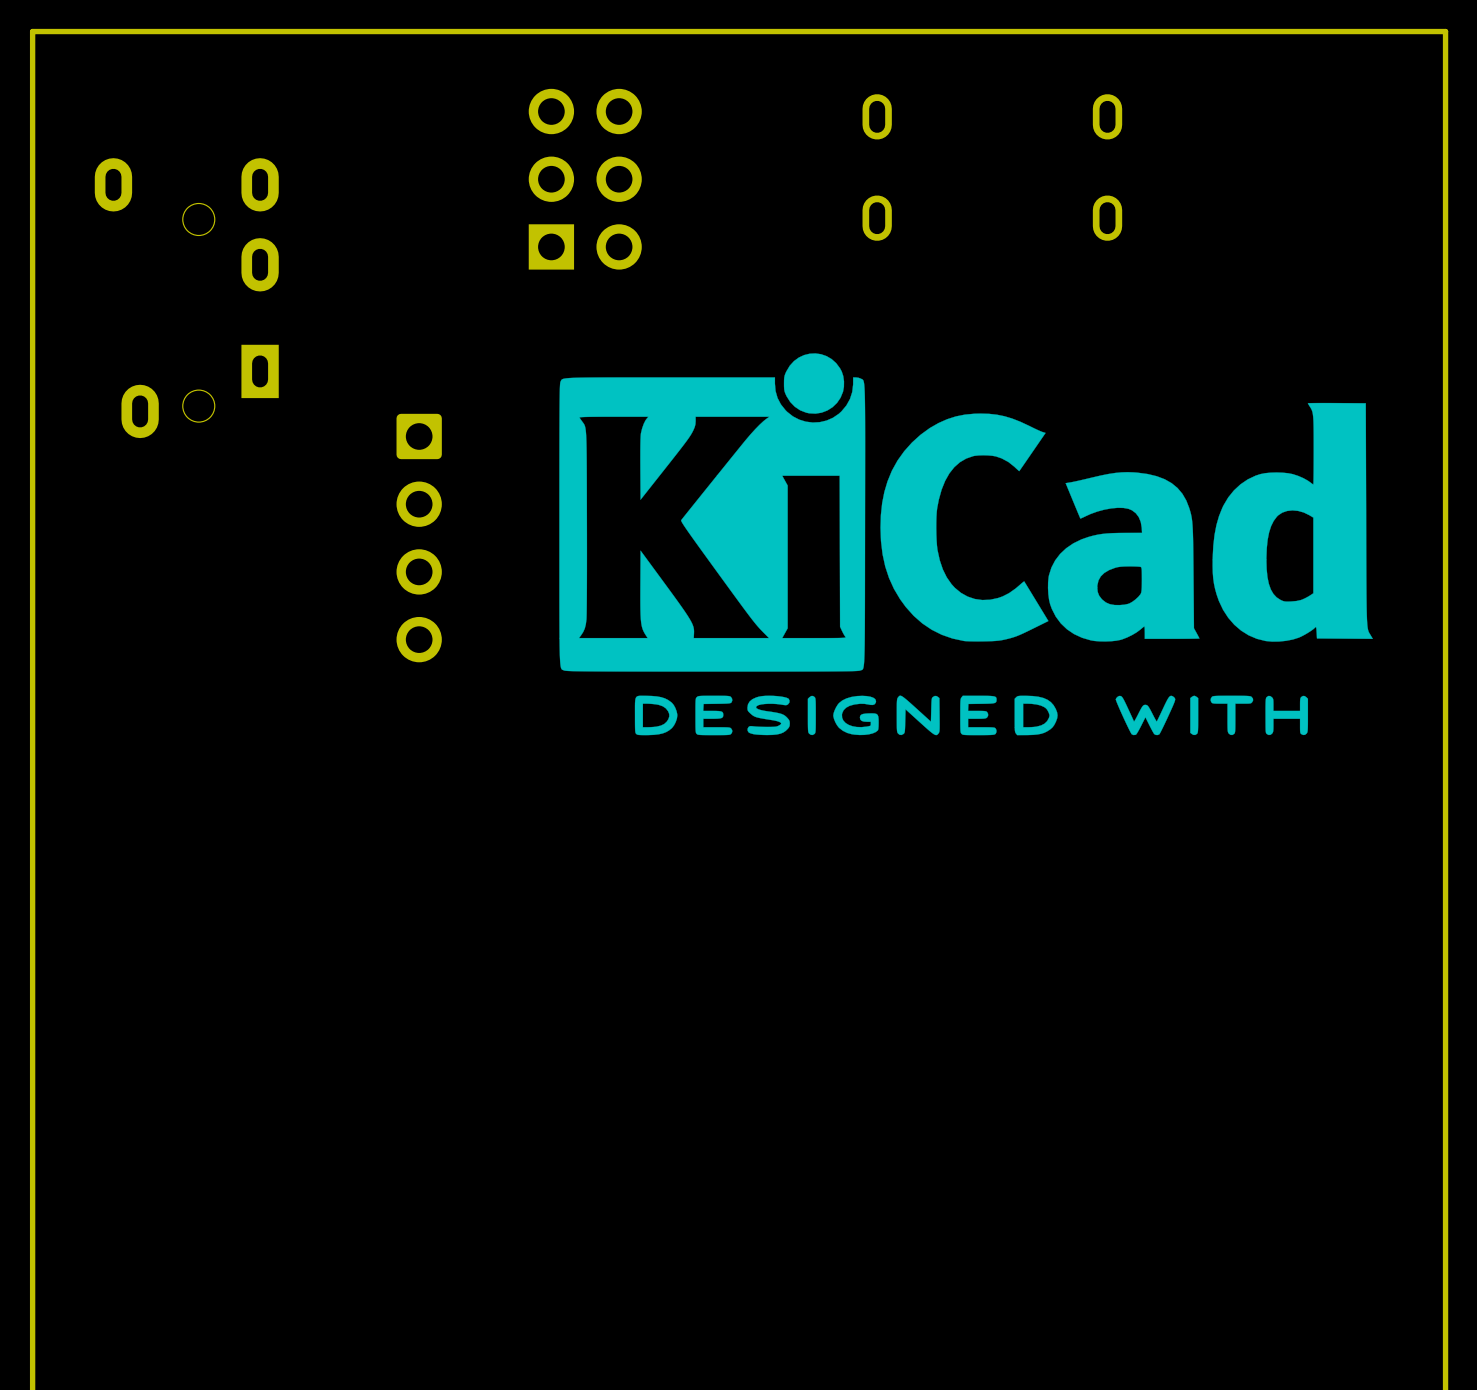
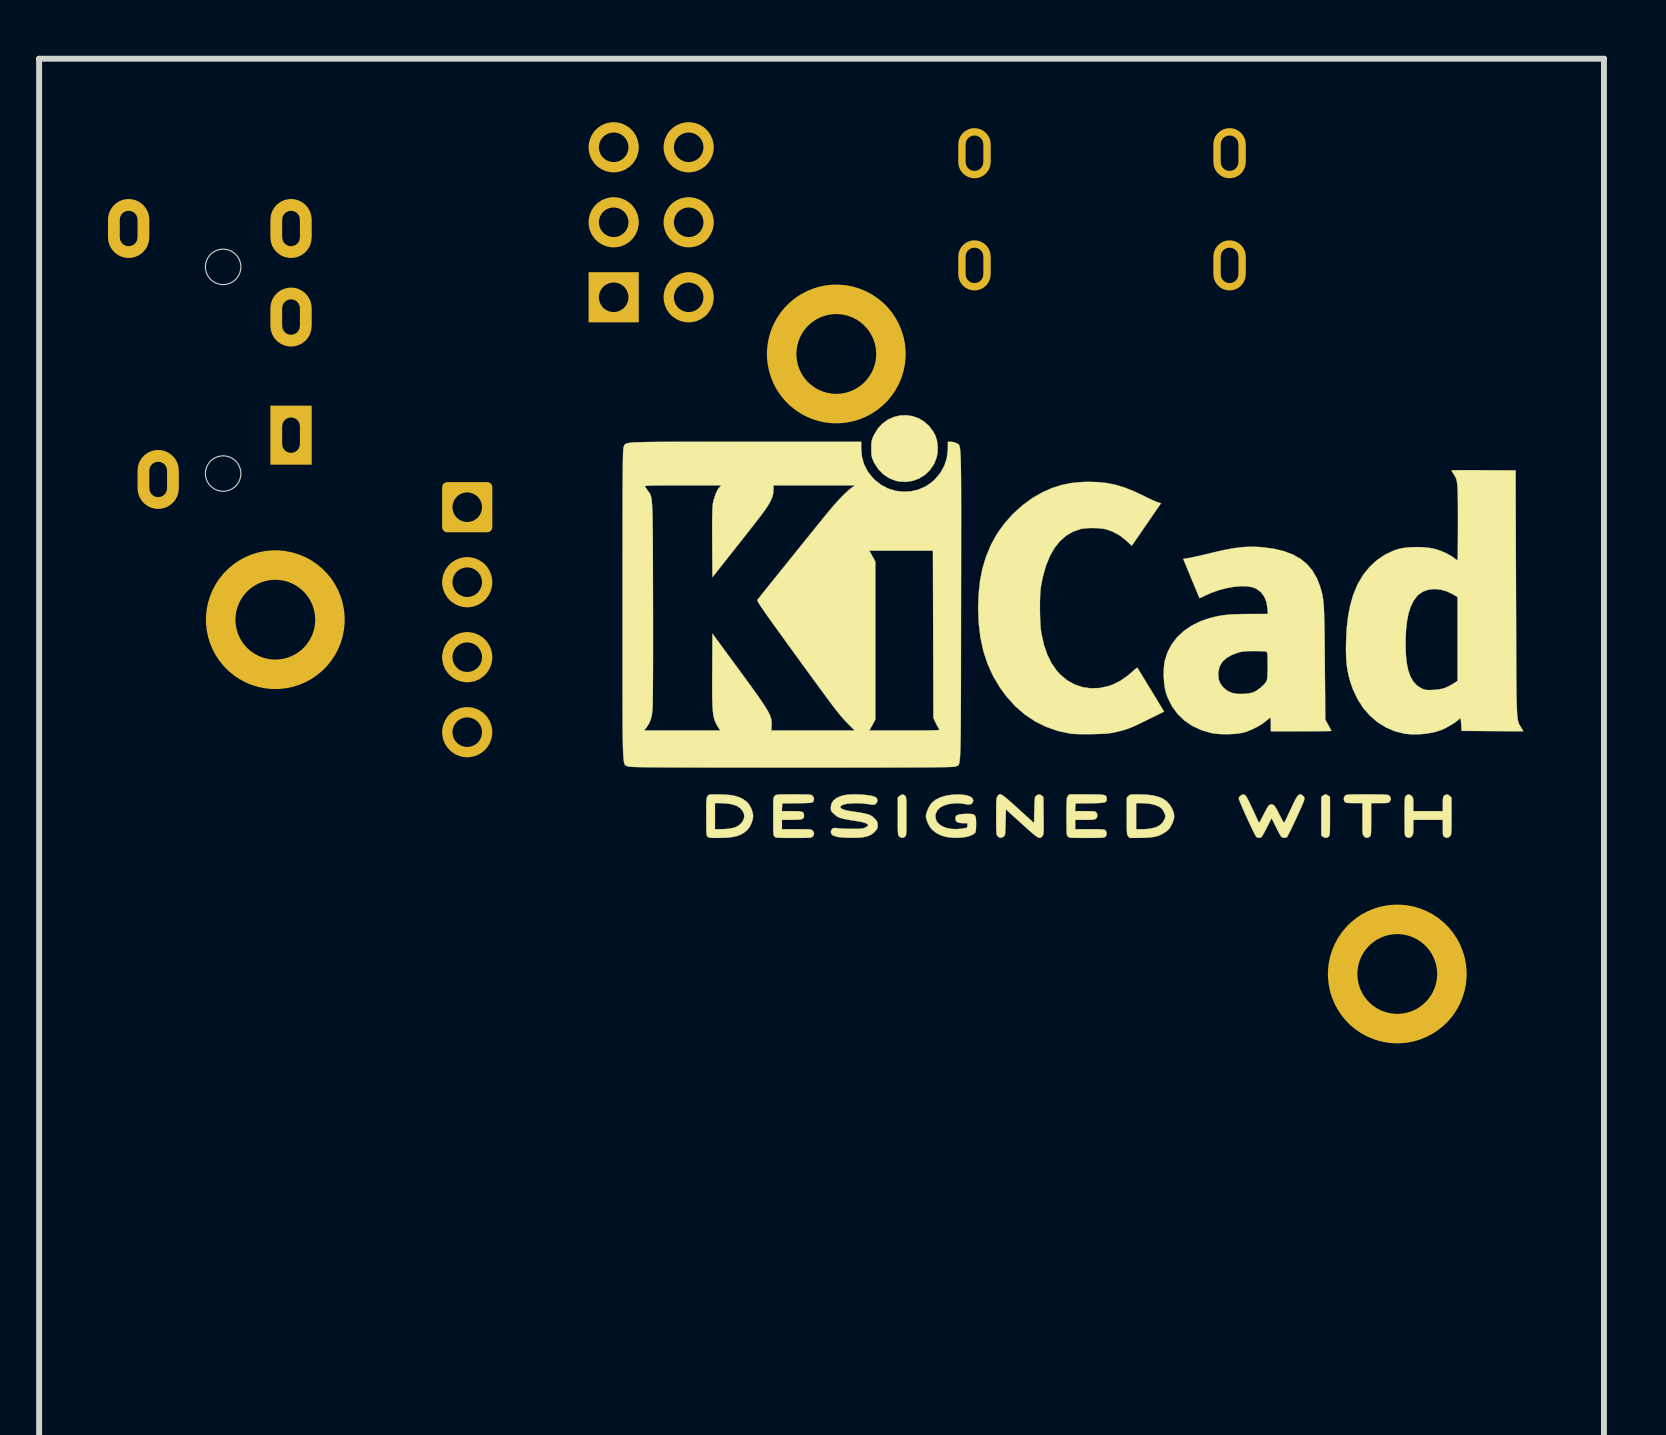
part: none -> (836, 353)
part: none -> (275, 619)
part: none -> (1397, 973)

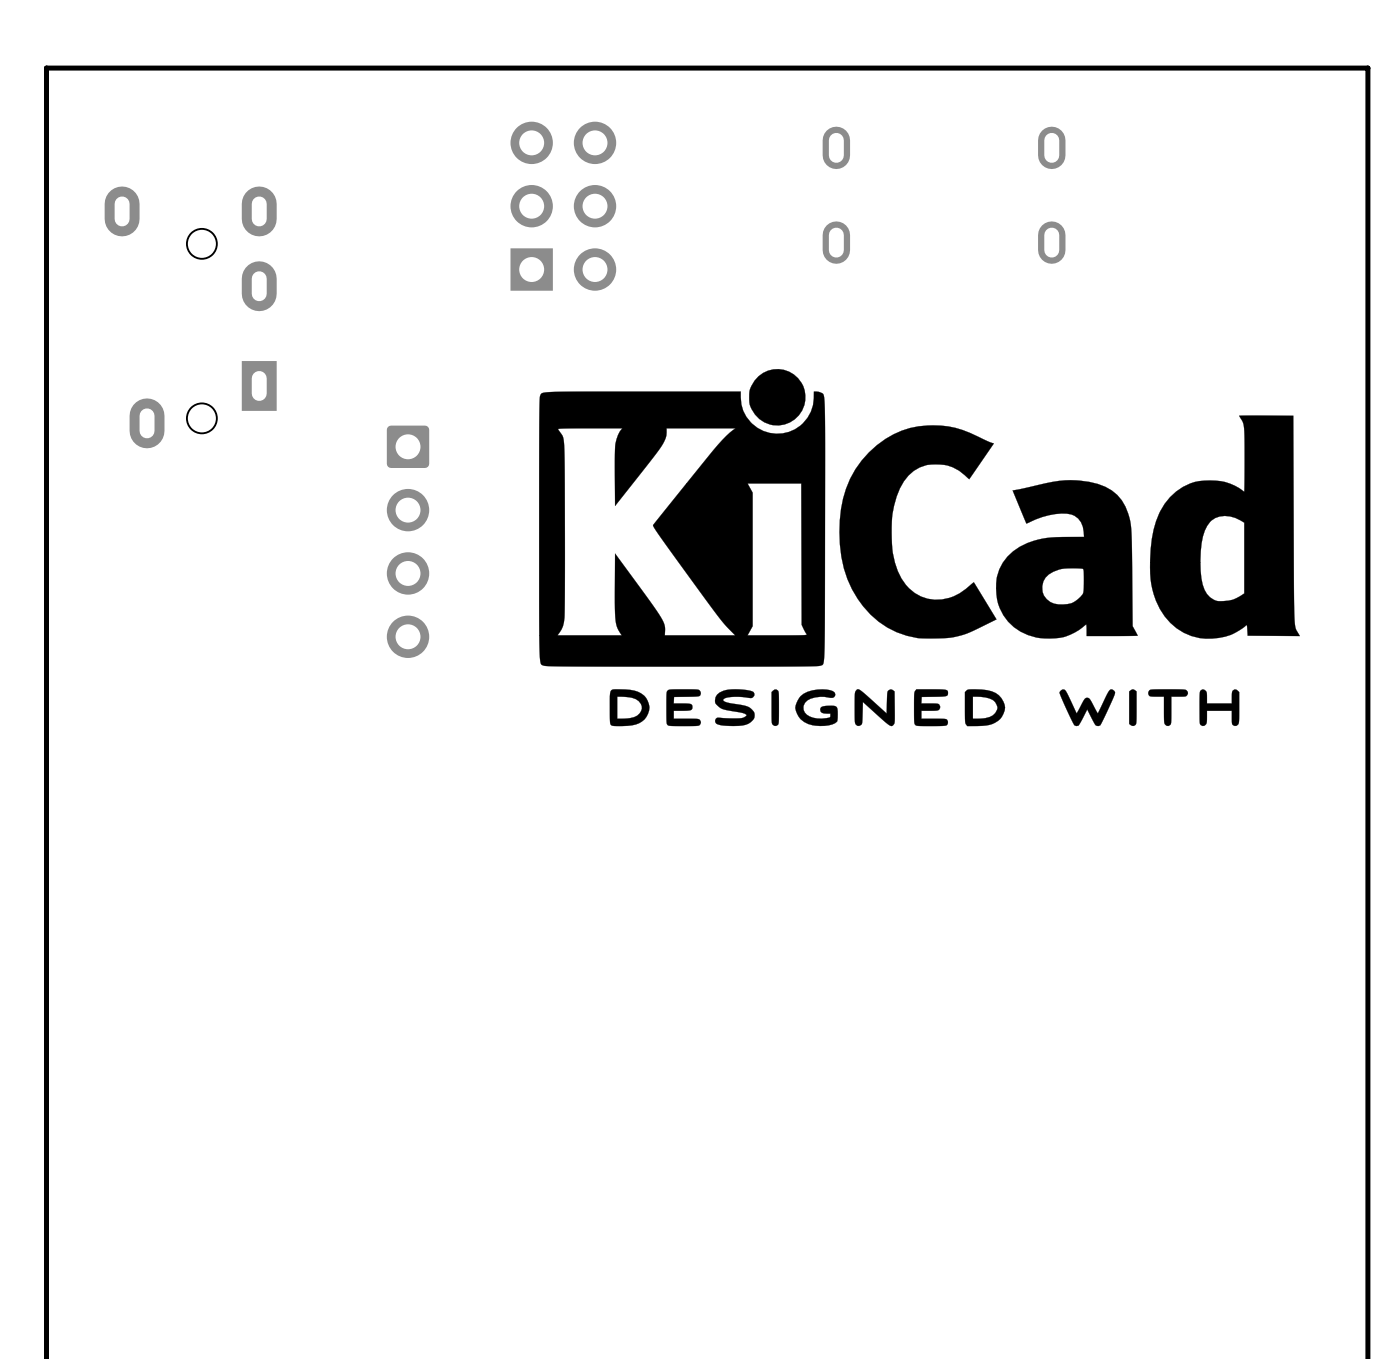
part: (836, 353) -> none
part: (275, 619) -> none
part: (1397, 973) -> none

